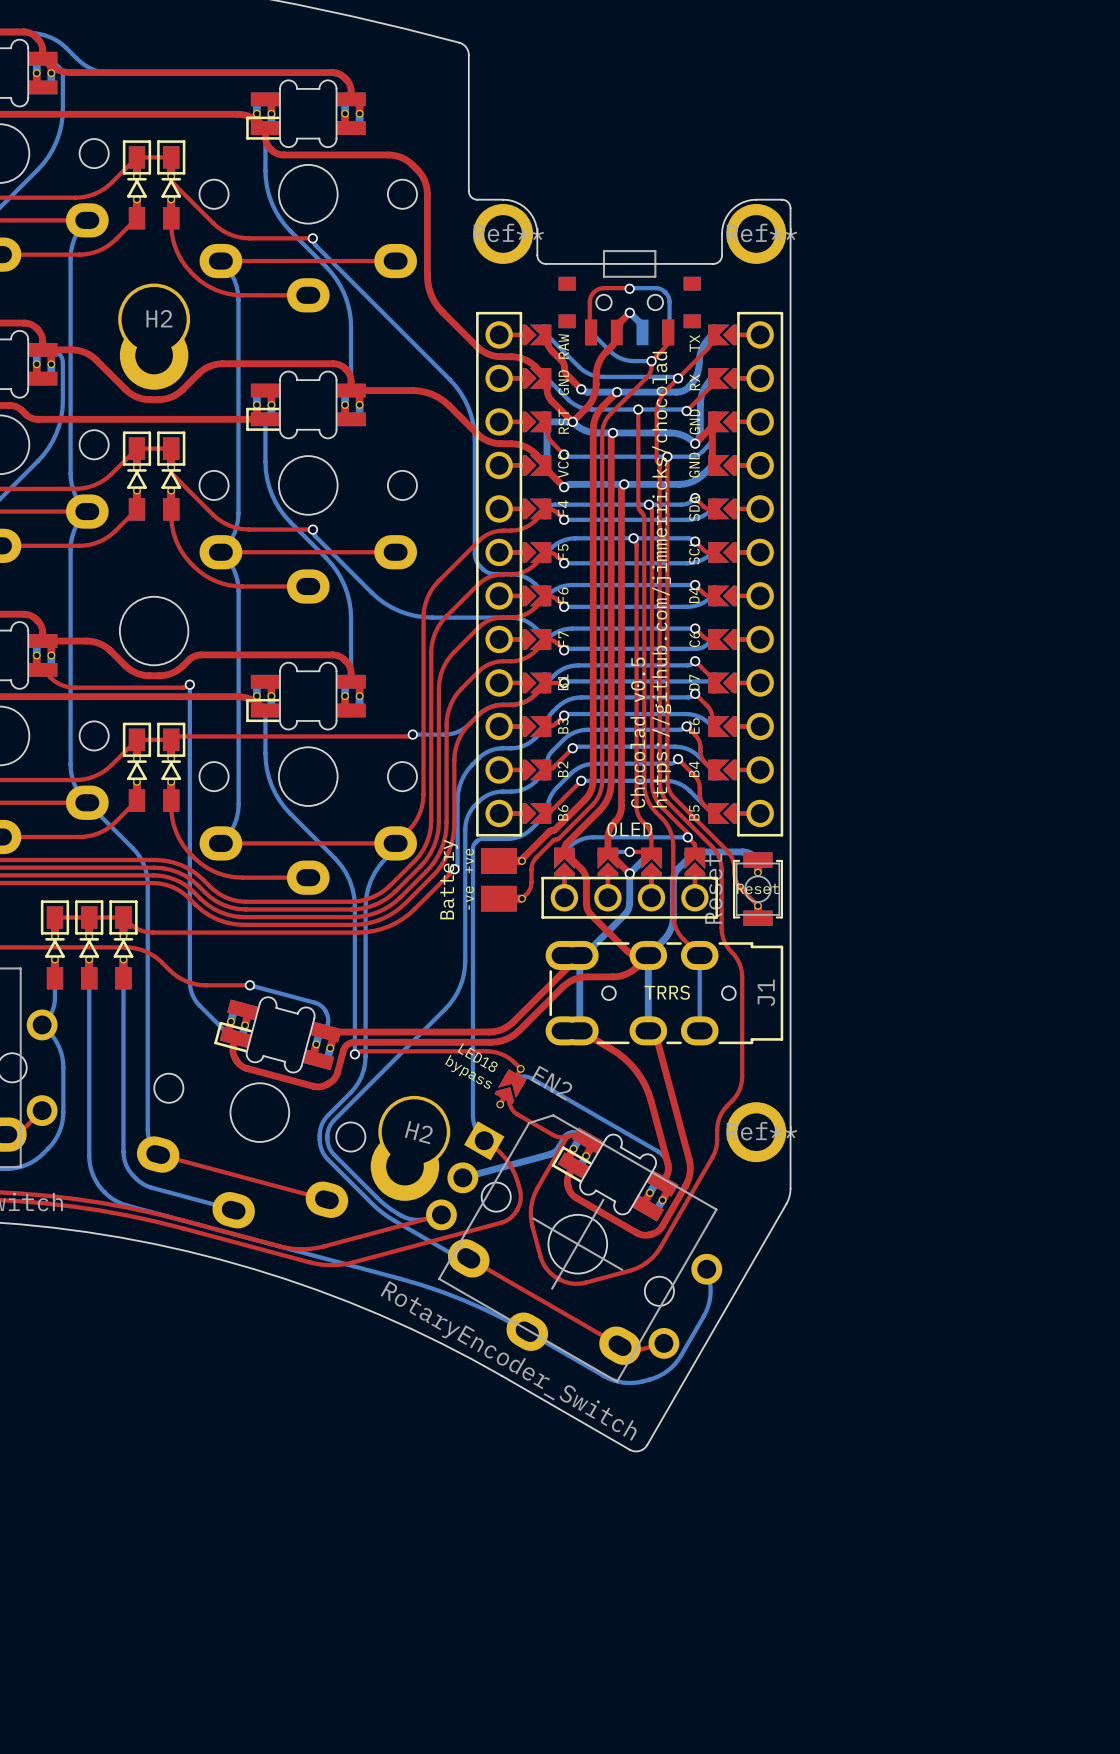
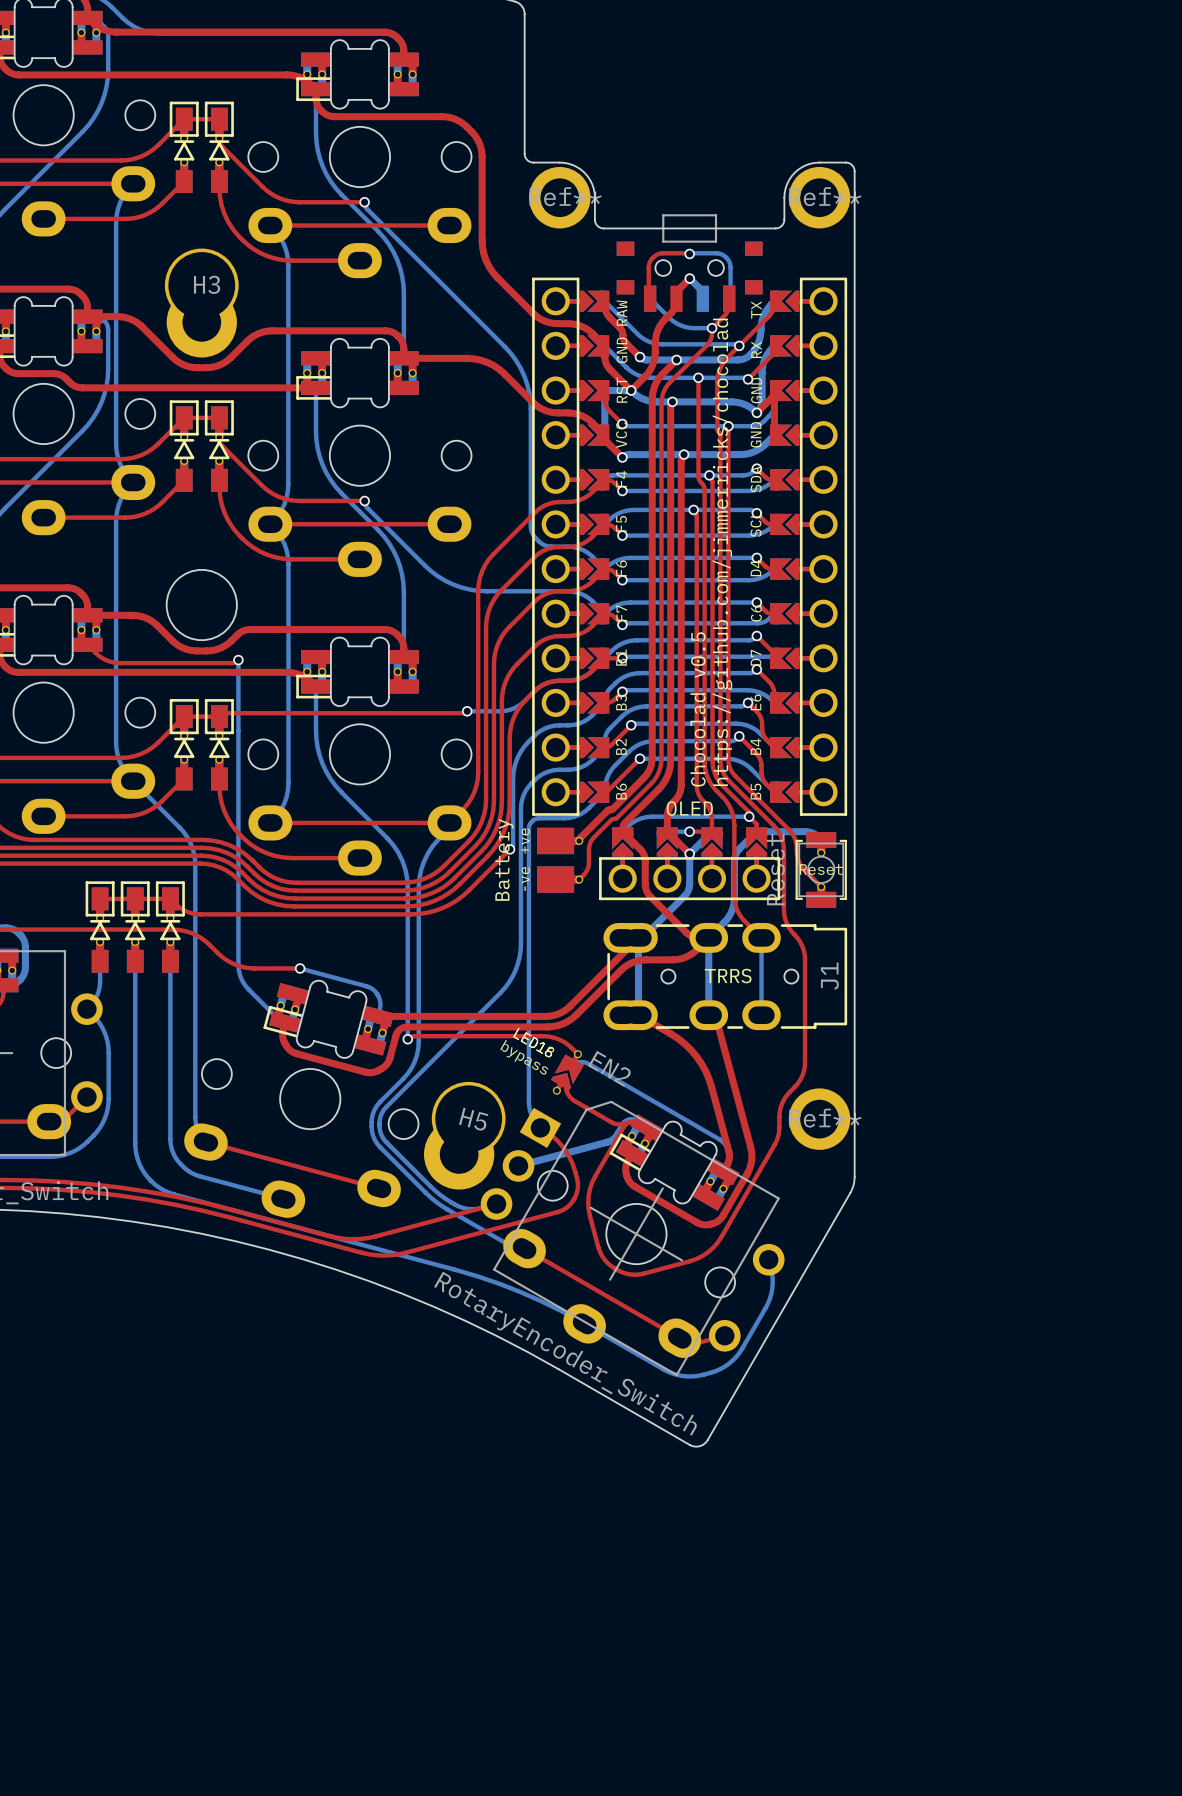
H2 name: H2 (159, 318) -> H3 (207, 284)
part footprint: [494, 1064, 527, 1109] -> [550, 1050, 584, 1095]
H2 name: H2 (418, 1132) -> H5 (473, 1119)

